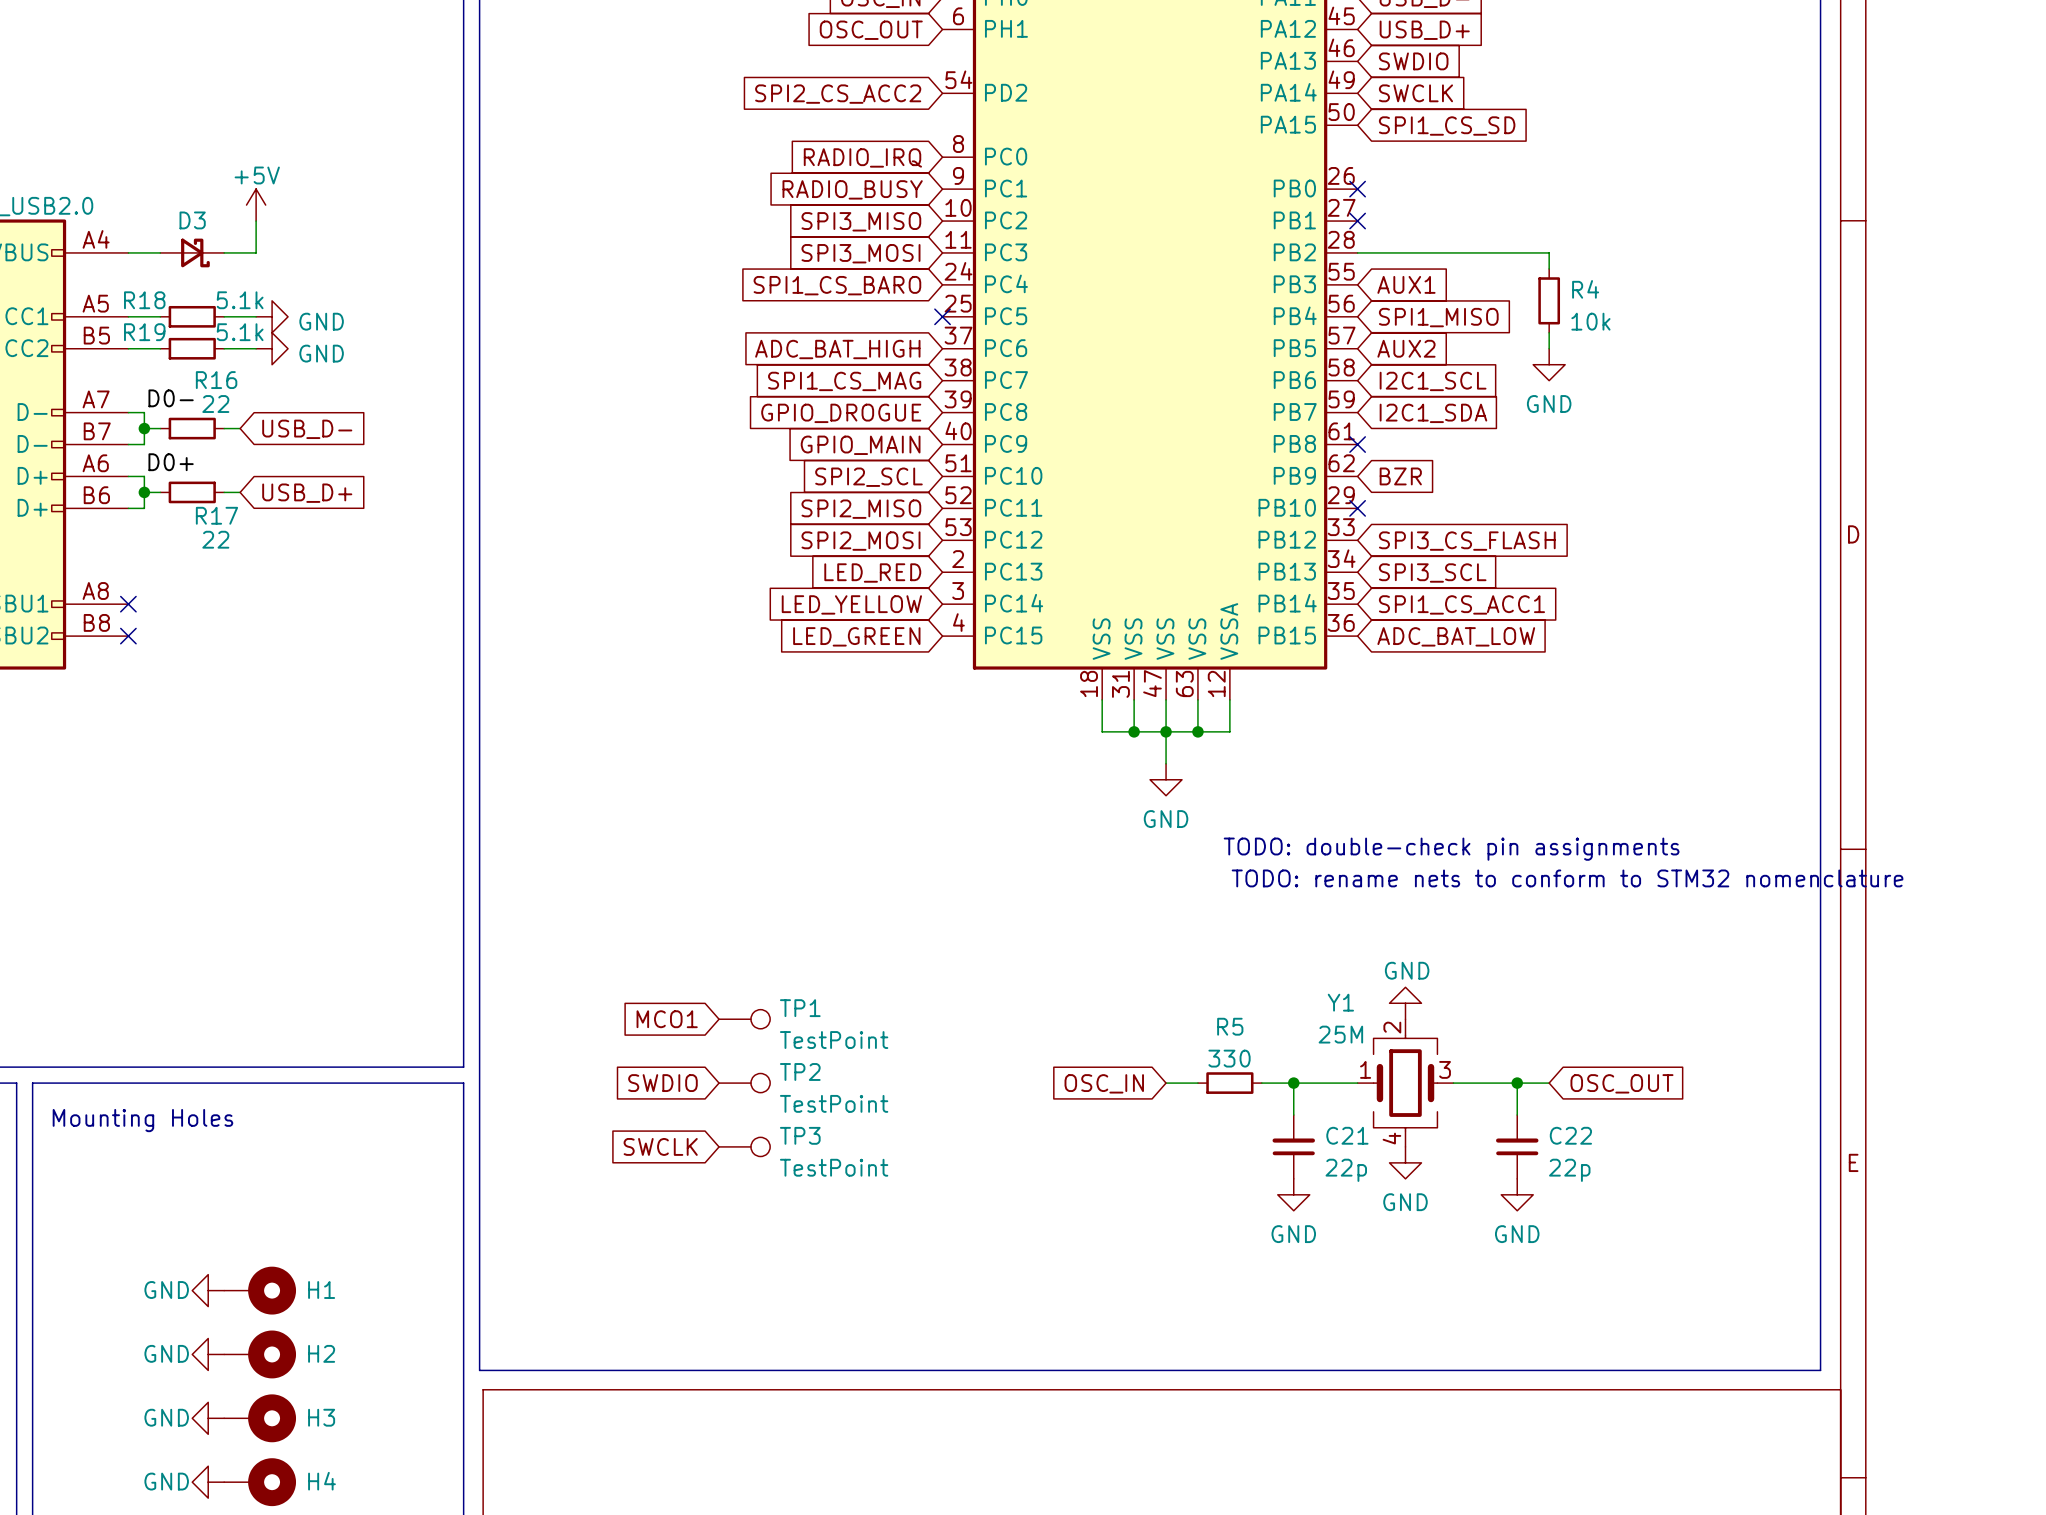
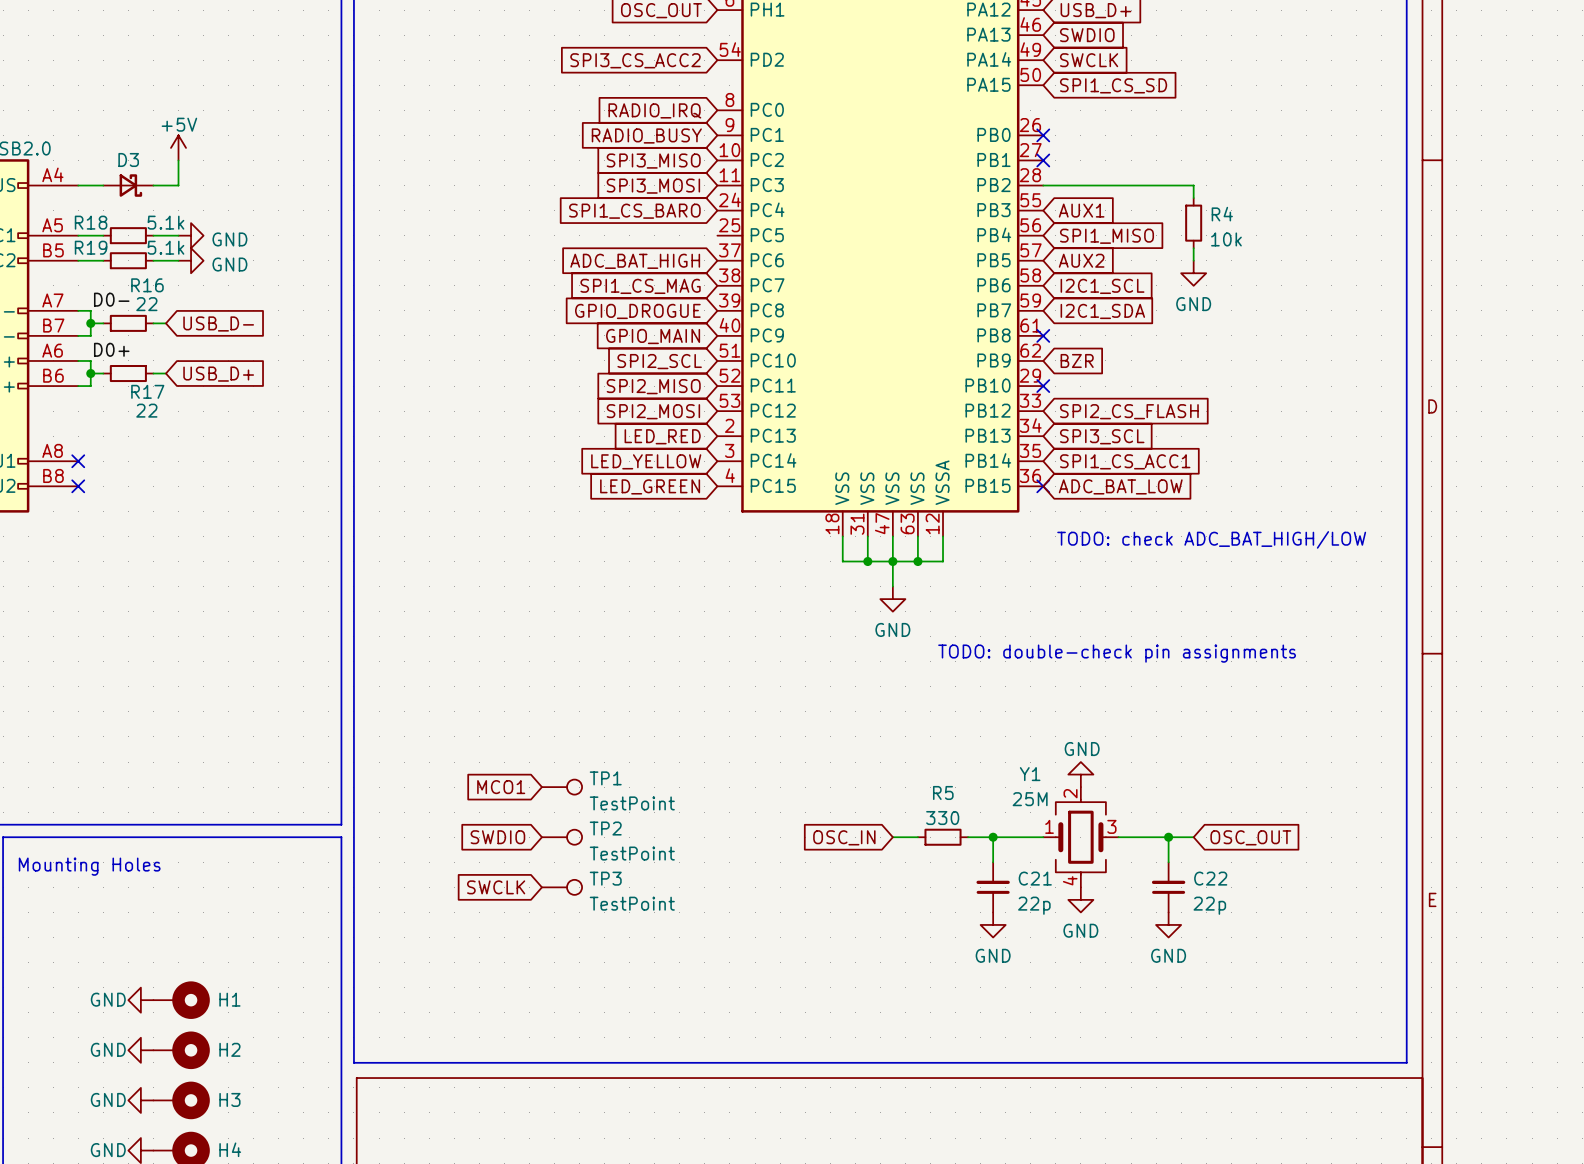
global label: SPI2_CS_ACC2 (838, 94) -> SPI3_CS_ACC2 (635, 60)
no-connect mark: (942, 316) -> none
global label: SPI3_CS_FLASH (1467, 541) -> SPI2_CS_FLASH (1129, 411)
no-connect mark: none -> (1043, 486)
text: none -> TODO: check ADC_BAT_HIGH/LOW (1211, 539)
text: TODO: rename nets to conform to STM32 nomenclature (1567, 878) -> none

